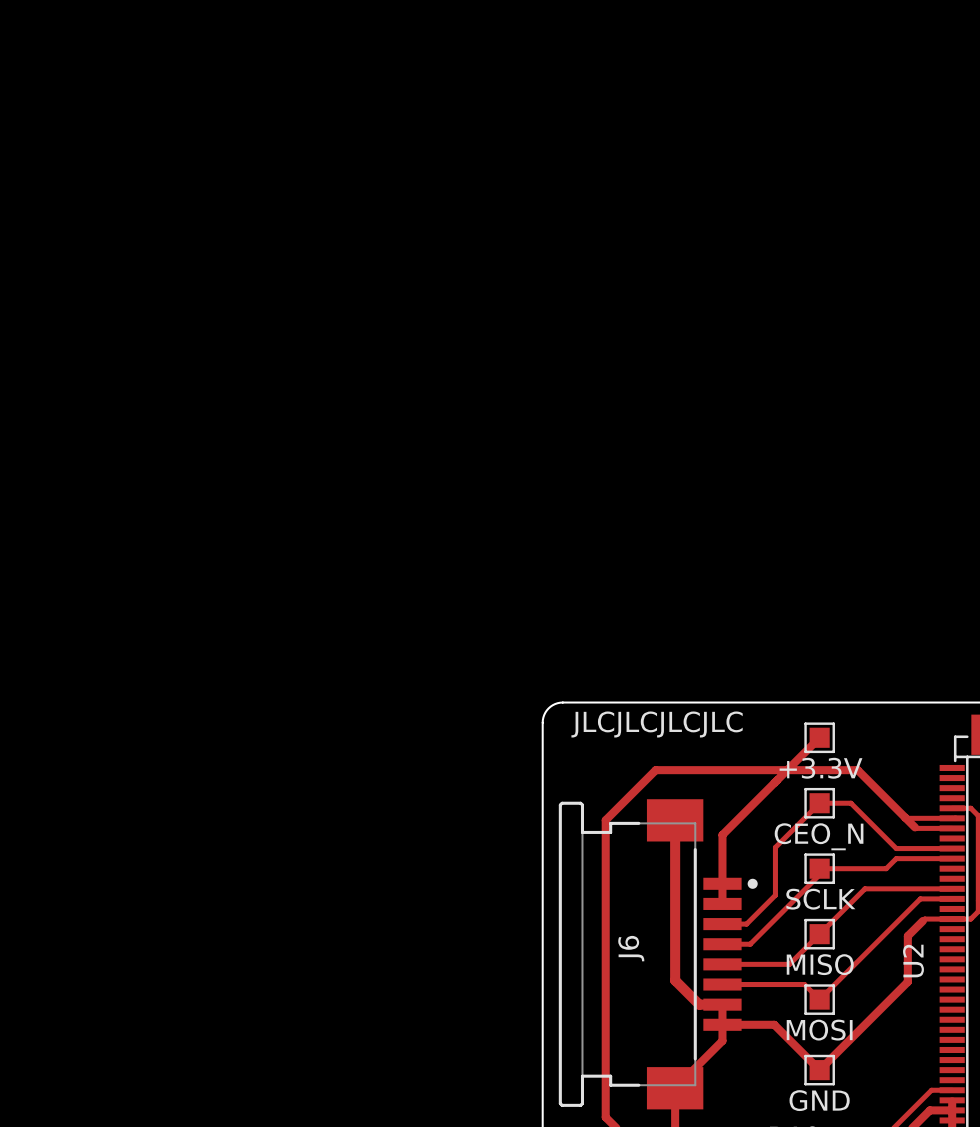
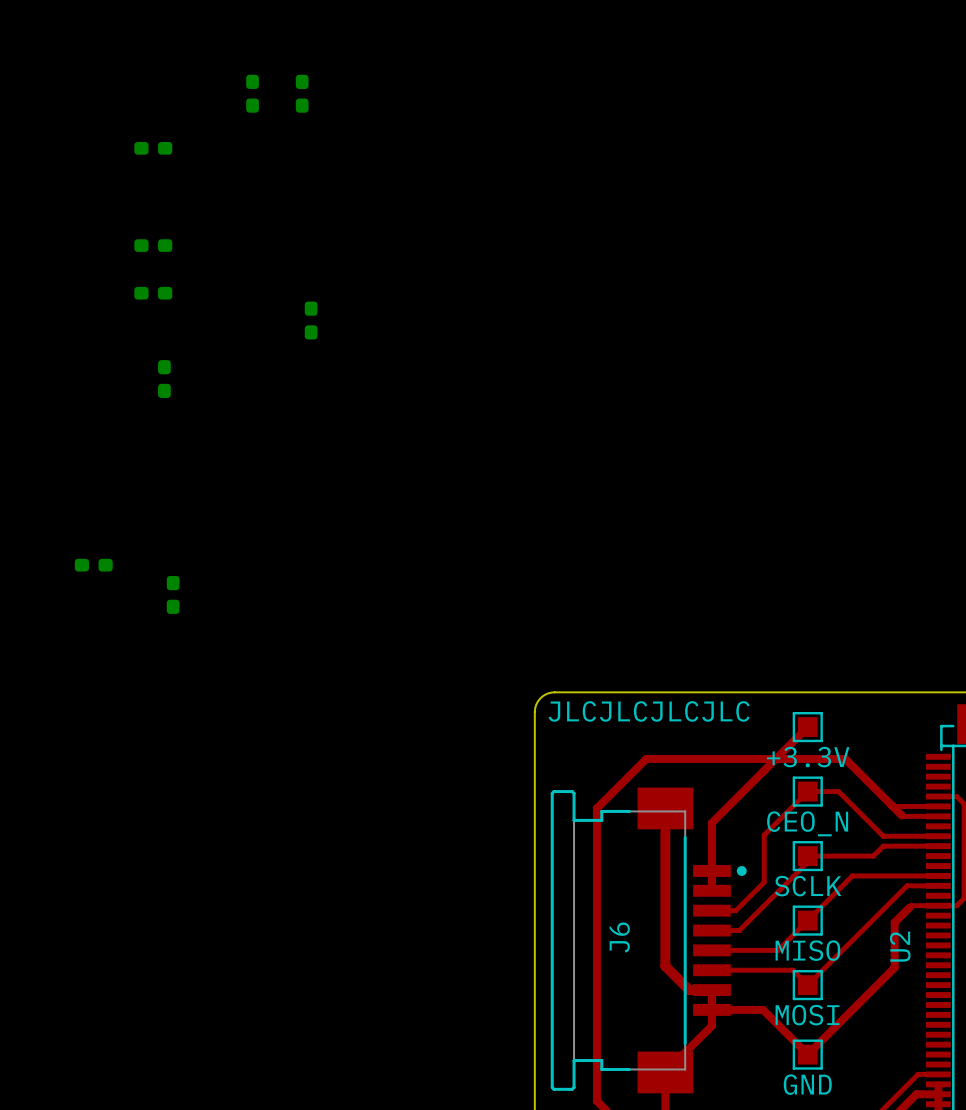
part: none -> (252, 93)
part: none -> (302, 93)
part: none -> (153, 148)
part: none -> (153, 245)
part: none -> (153, 293)
part: none -> (311, 320)
part: none -> (164, 379)
part: none -> (93, 565)
part: none -> (173, 594)

